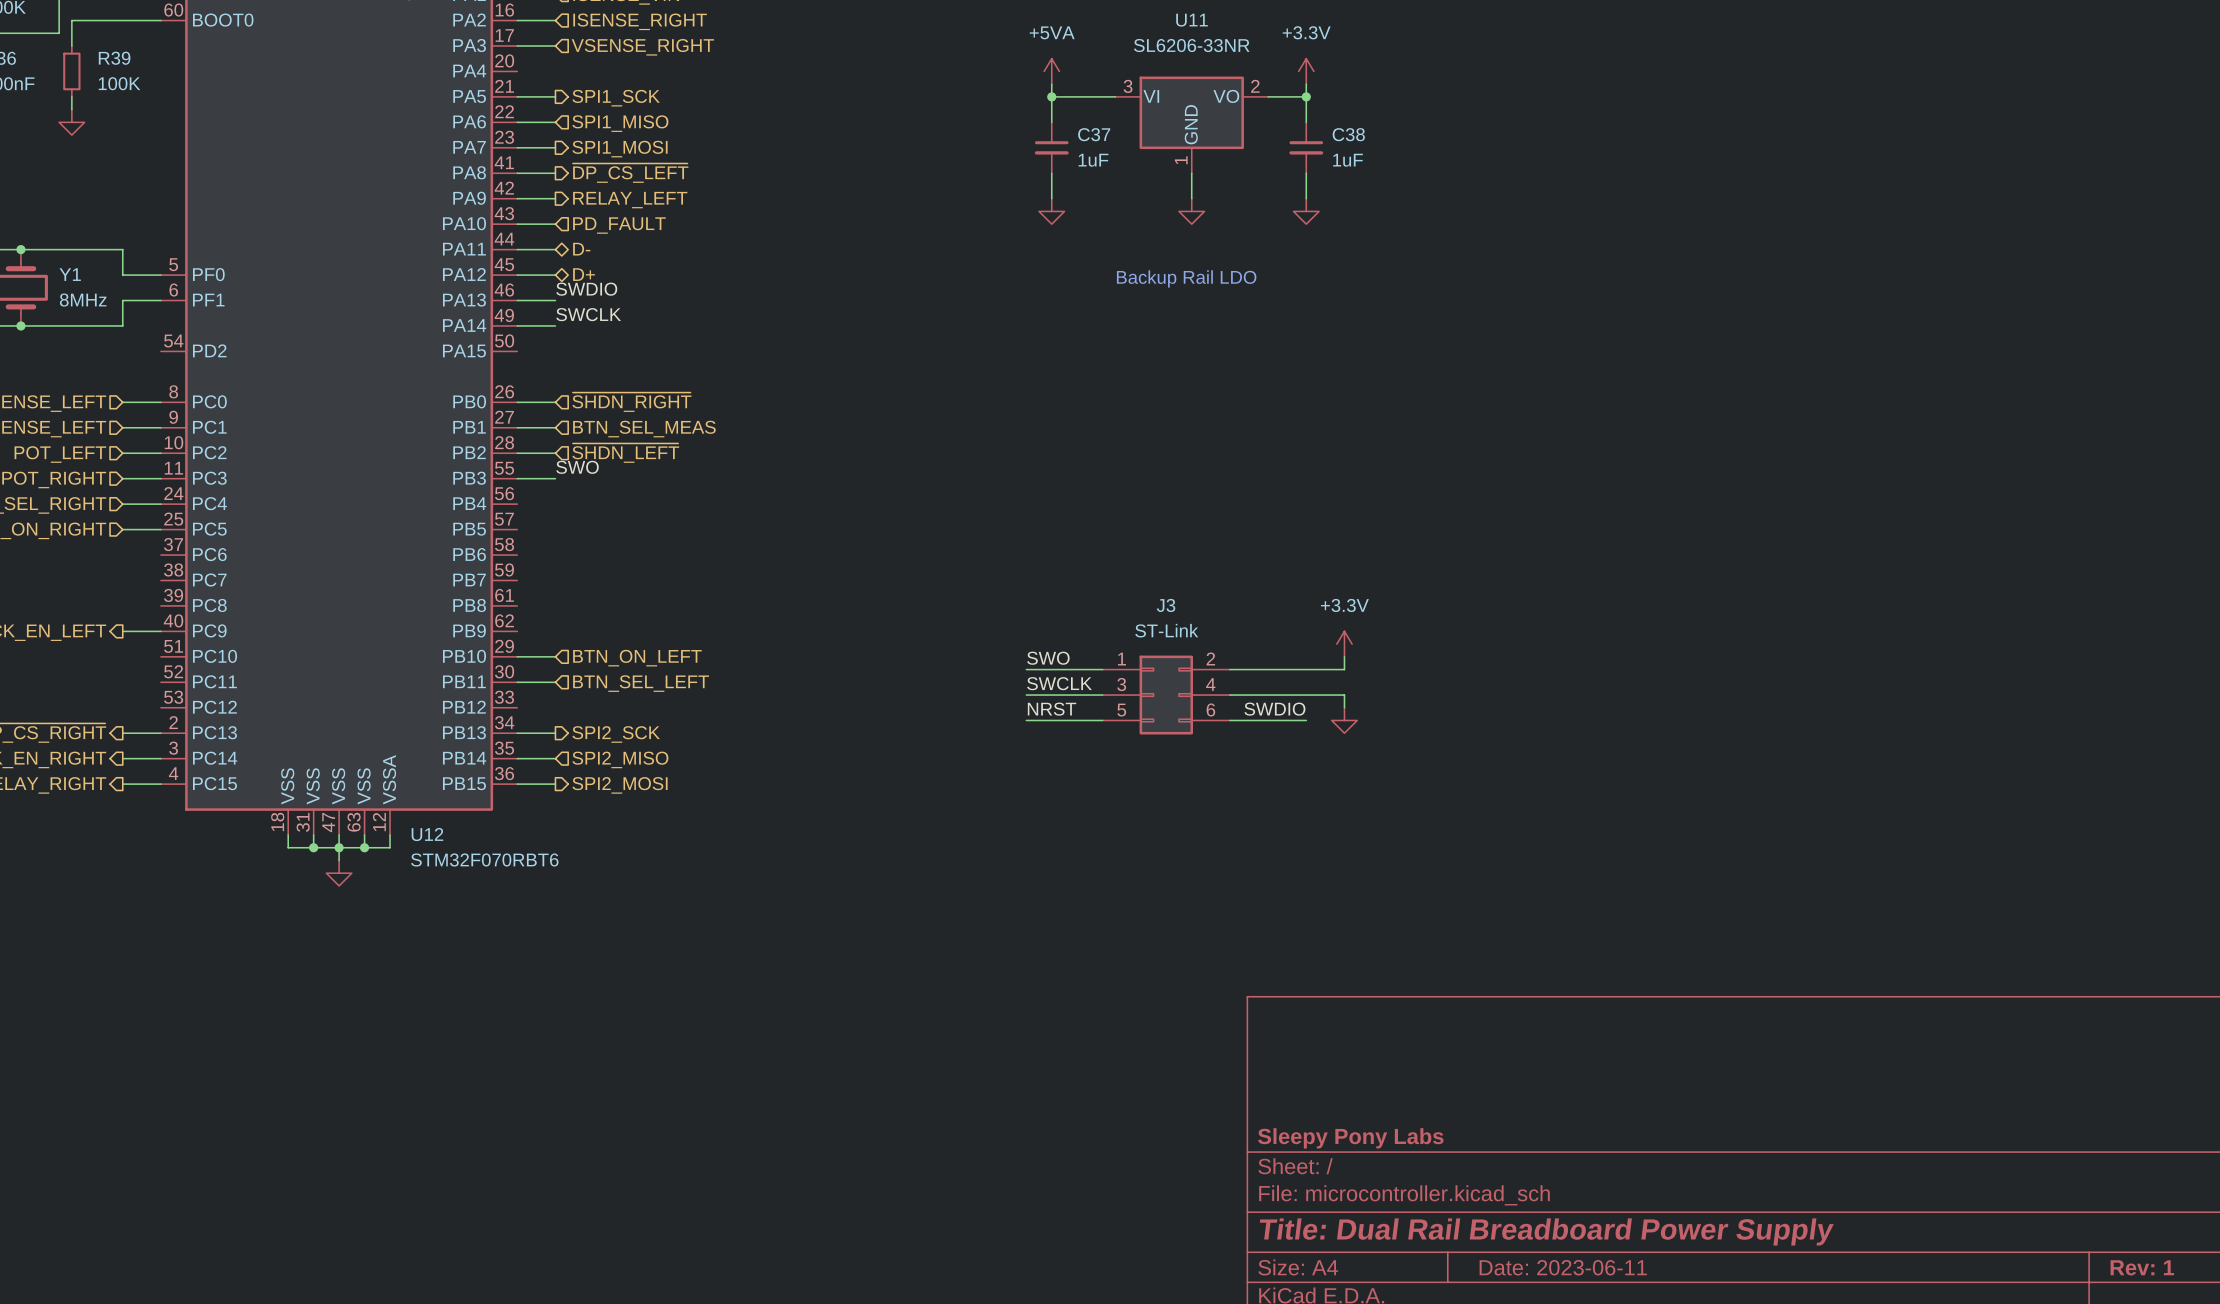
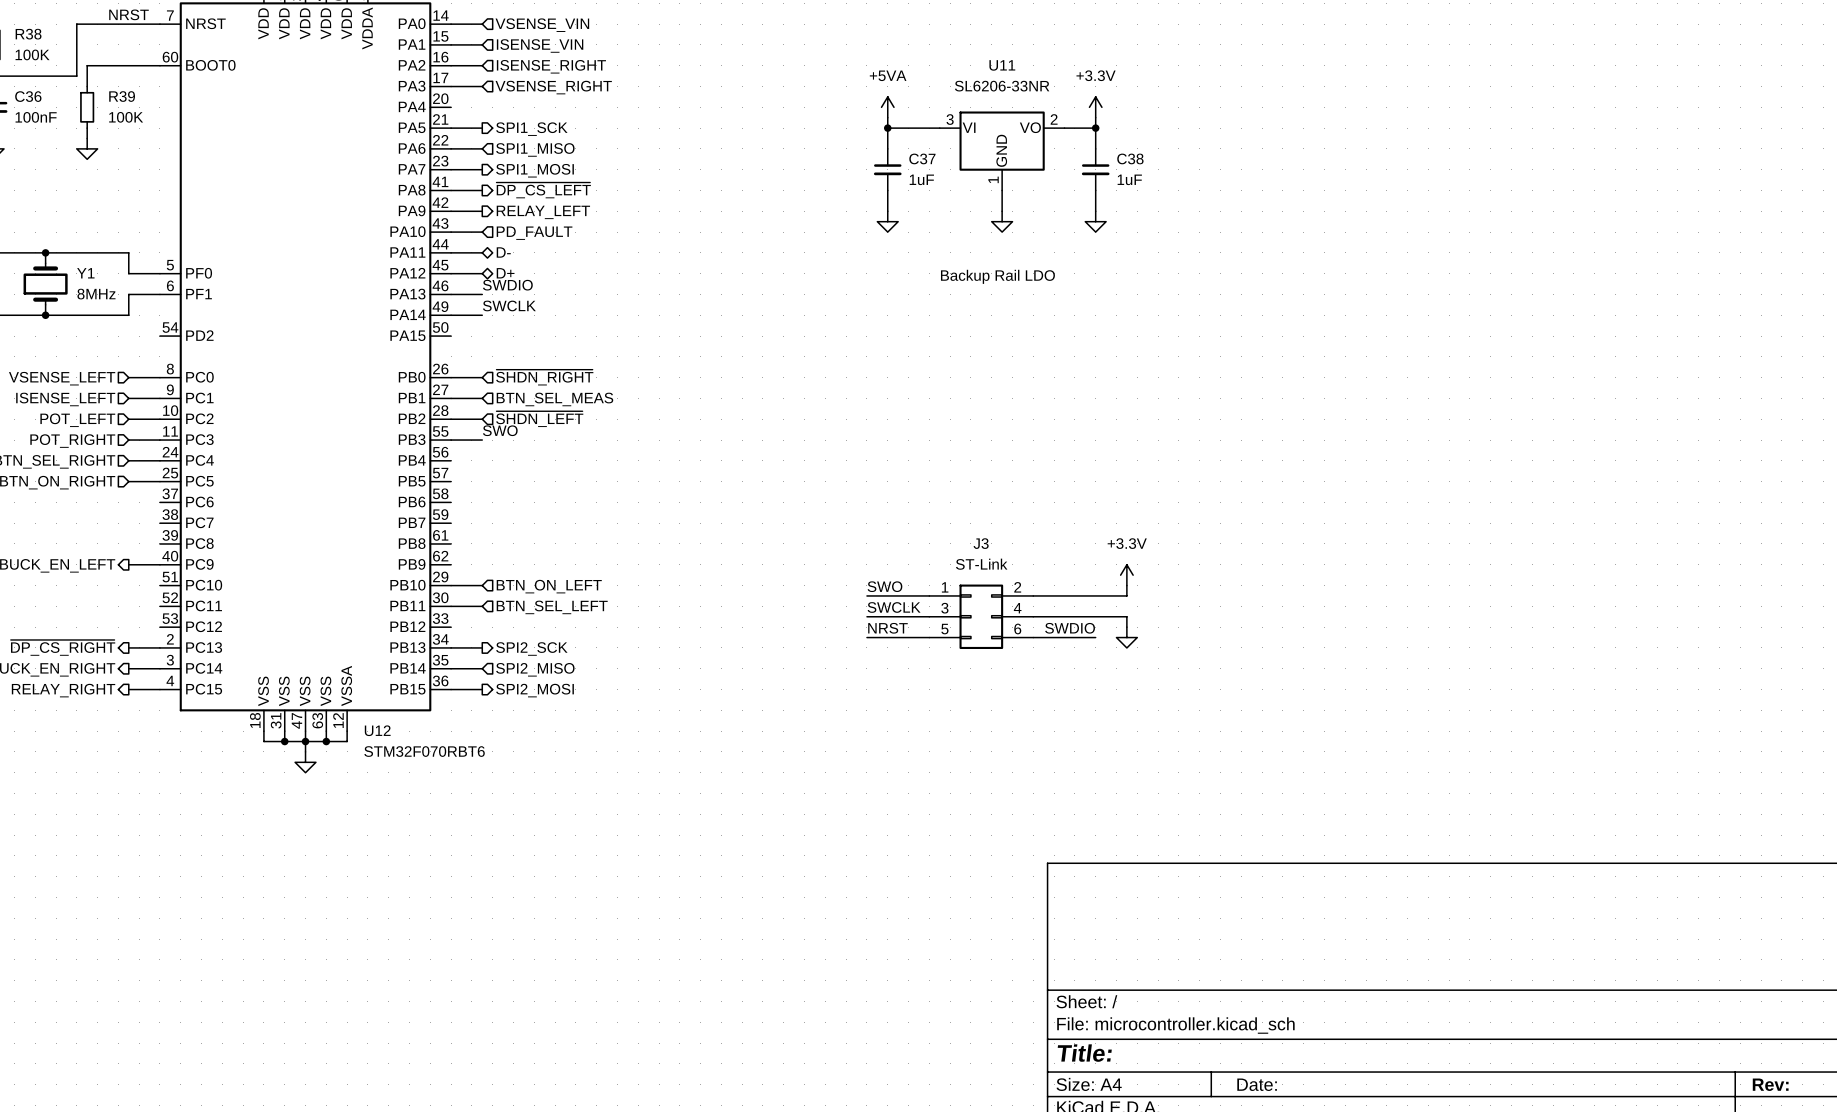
title block: Sleepy Pony Labs (1350, 1138) -> none
title block: Title: Dual Rail Breadboard Power Supply (1546, 1231) -> Title: (1084, 1053)
title block: Date: 2023-06-11 (1563, 1267) -> Date: (1257, 1084)
title block: Rev: 1 (2142, 1267) -> Rev: (1770, 1084)

